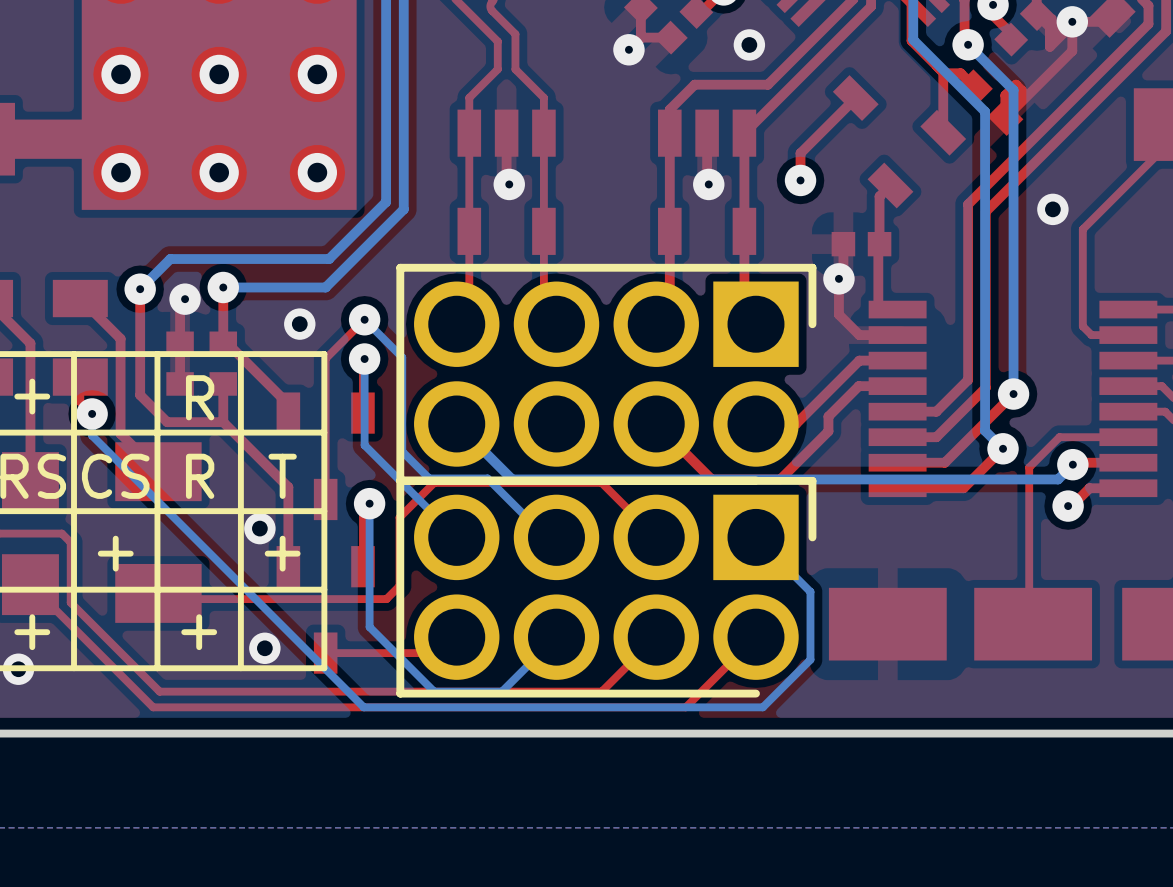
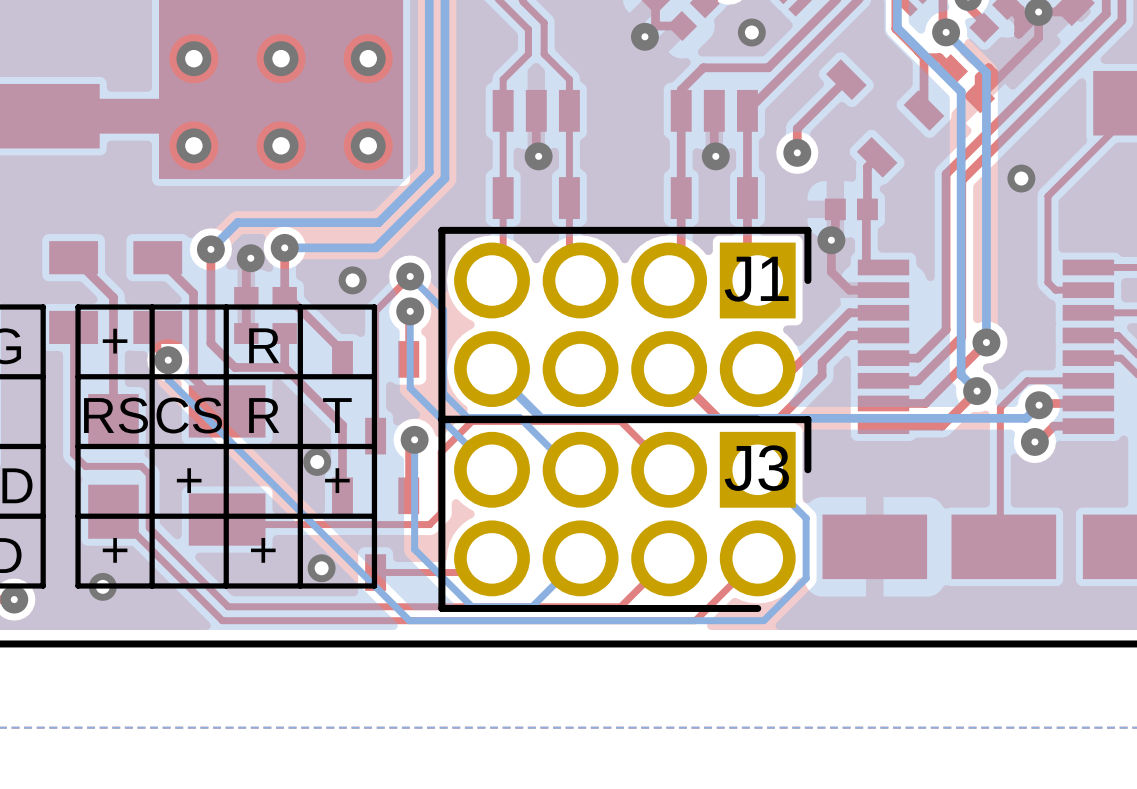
J1 name: none -> J1 (756, 279)
J3 name: none -> J3 (756, 468)

